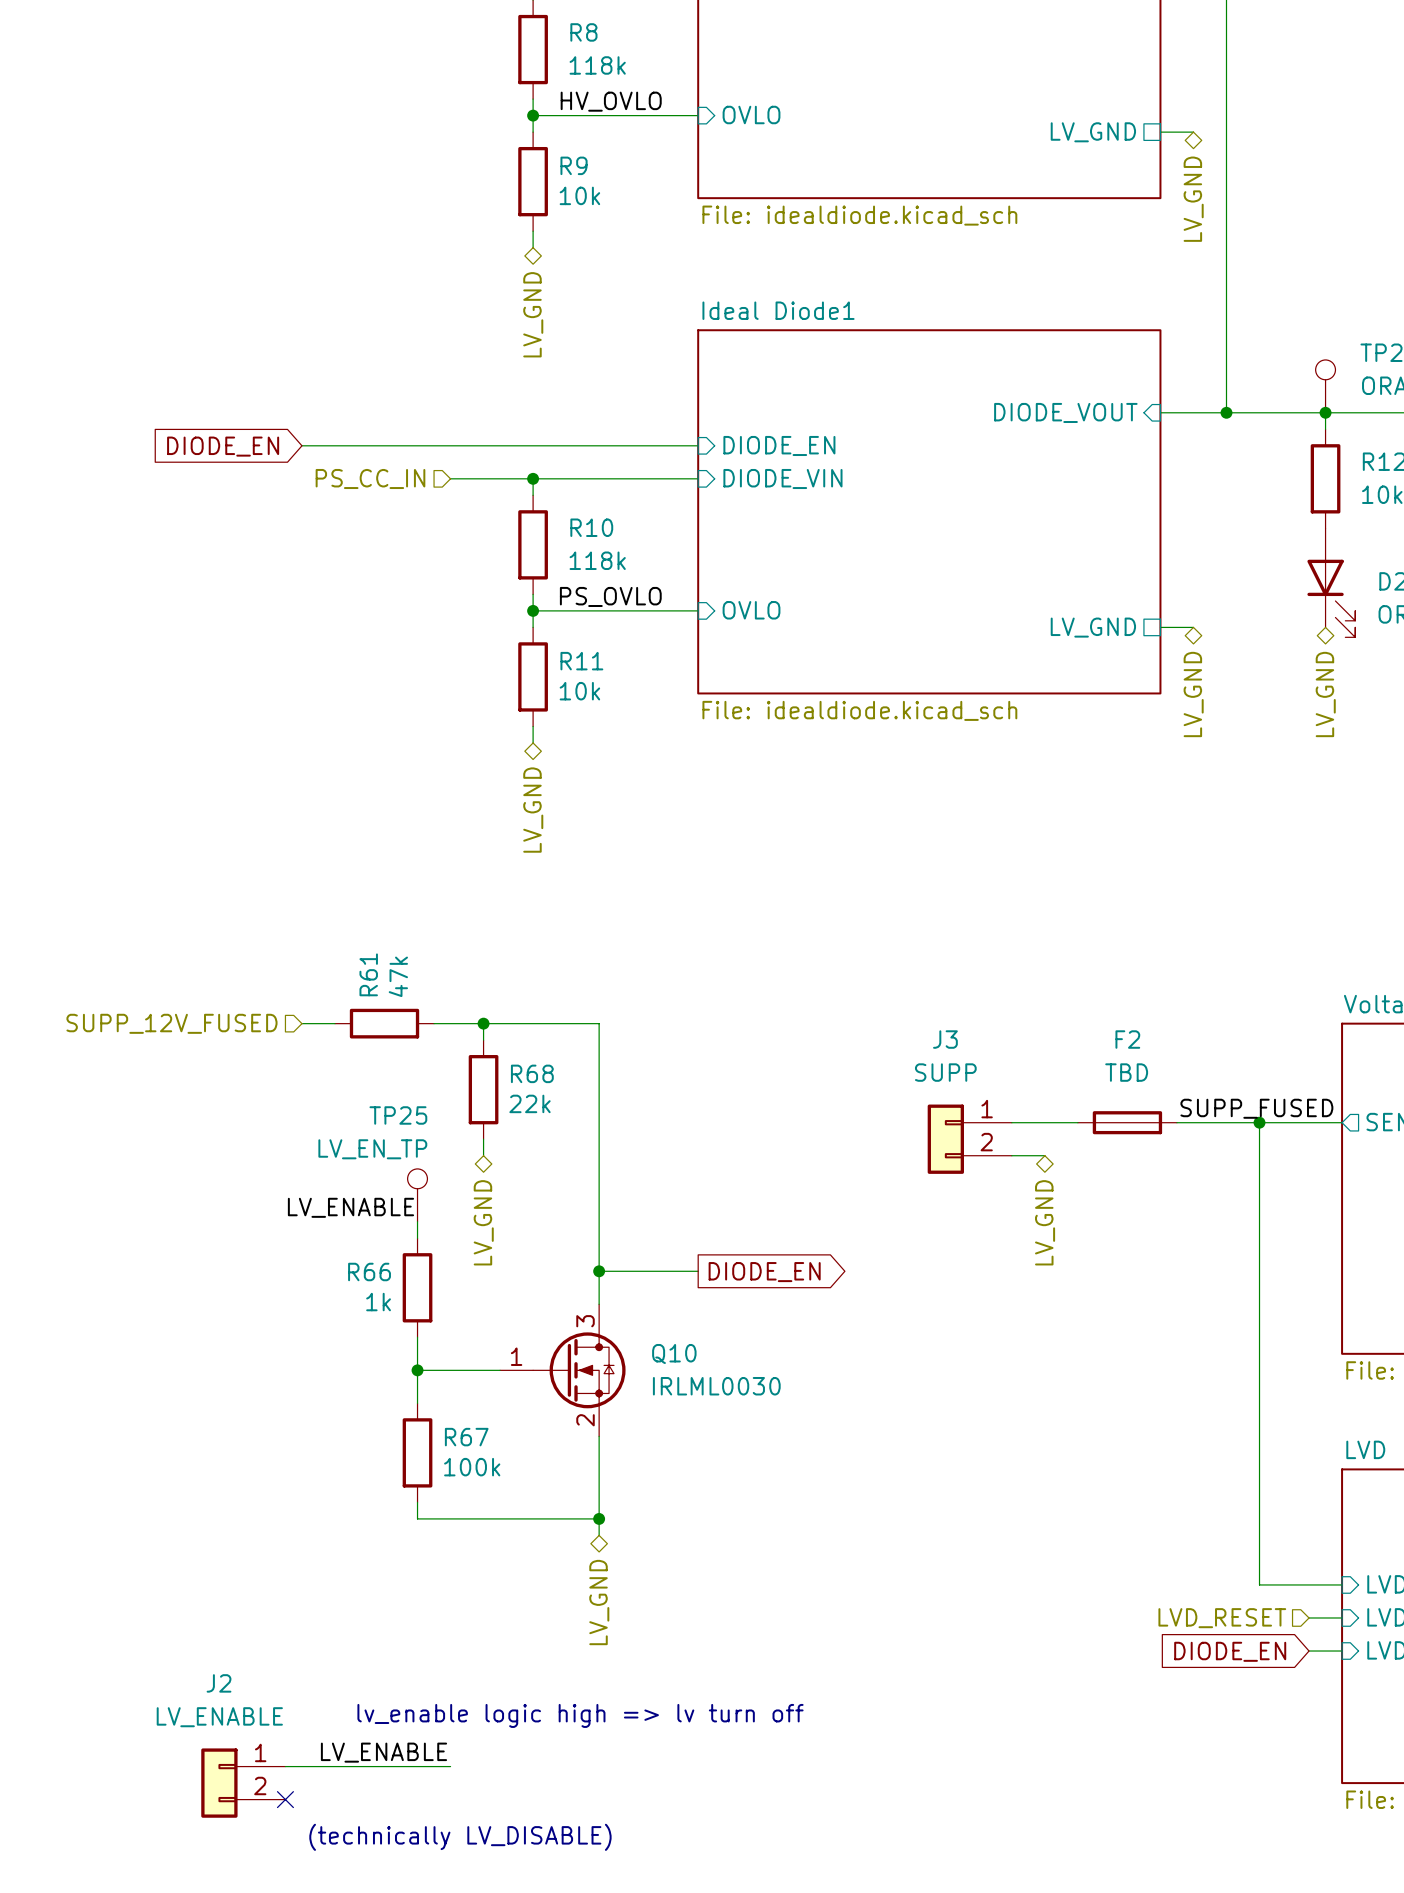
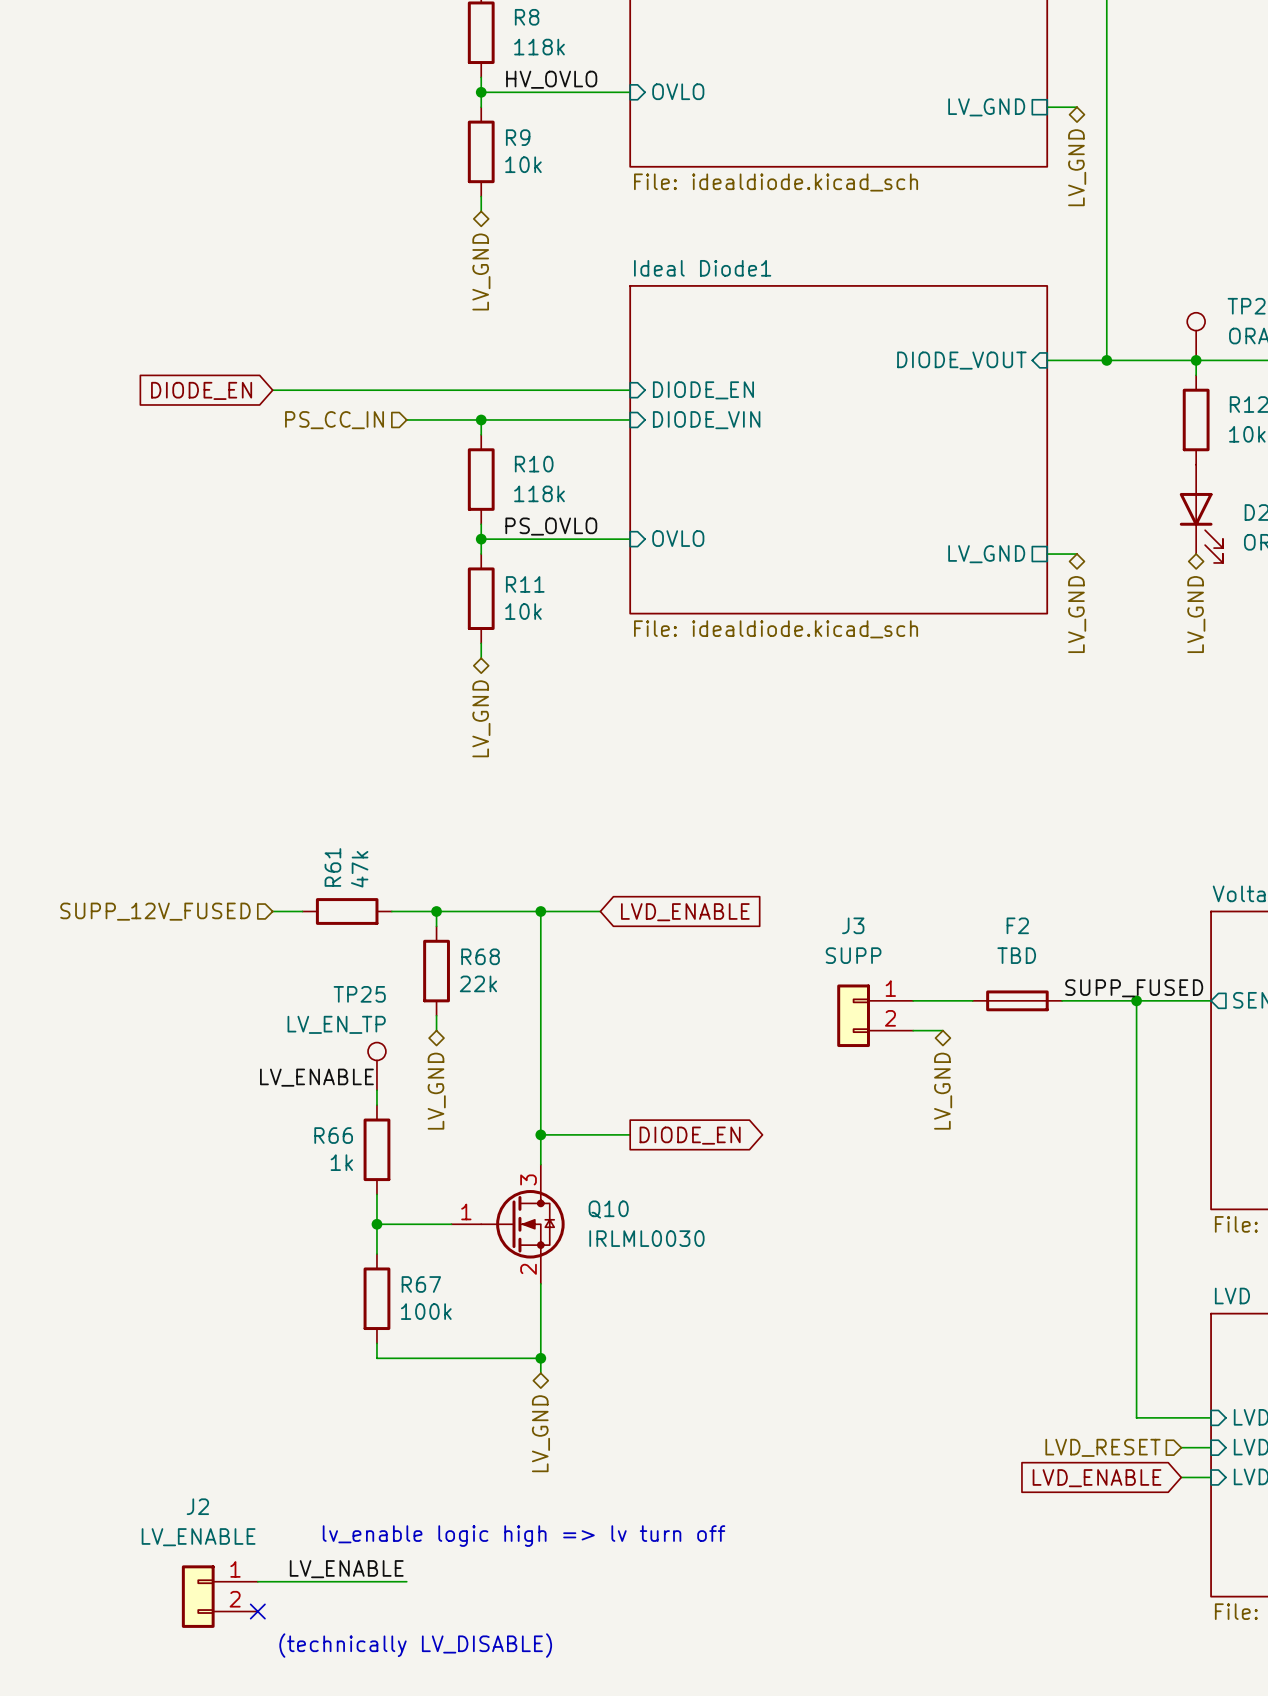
wire: none -> (540, 911) (600, 911)
junction: none -> (540, 911)
global label: none -> LVD_ENABLE (685, 912)
global label: DIODE_EN (1230, 1651) -> LVD_ENABLE (1097, 1478)

